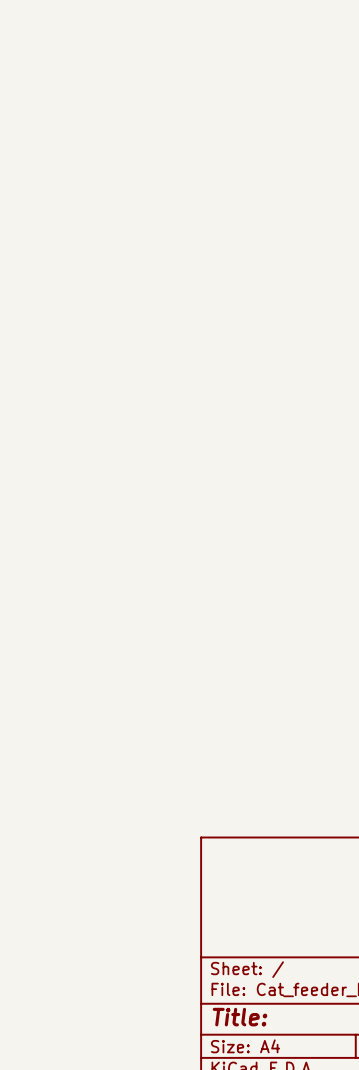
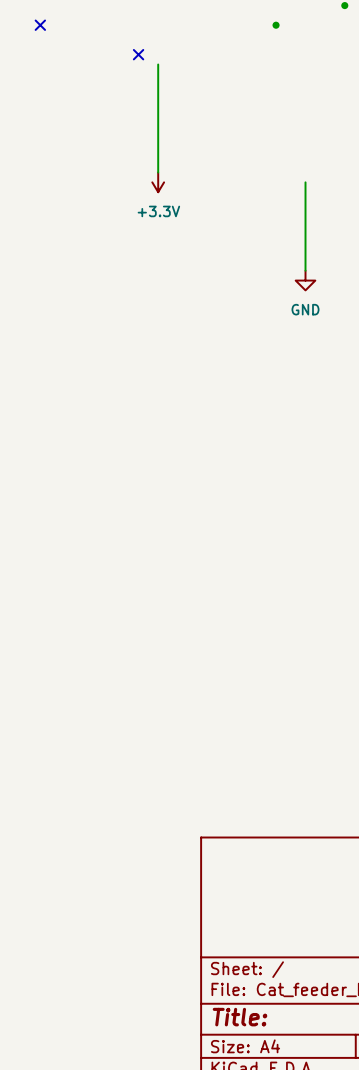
junction: none -> (344, 5)
no-connect mark: none -> (40, 25)
junction: none -> (276, 25)
no-connect mark: none -> (138, 54)
wire: none -> (158, 64) (158, 172)
power symbol: none -> +3.3V (158, 182)
wire: none -> (305, 182) (305, 270)
power symbol: none -> GND (305, 280)

